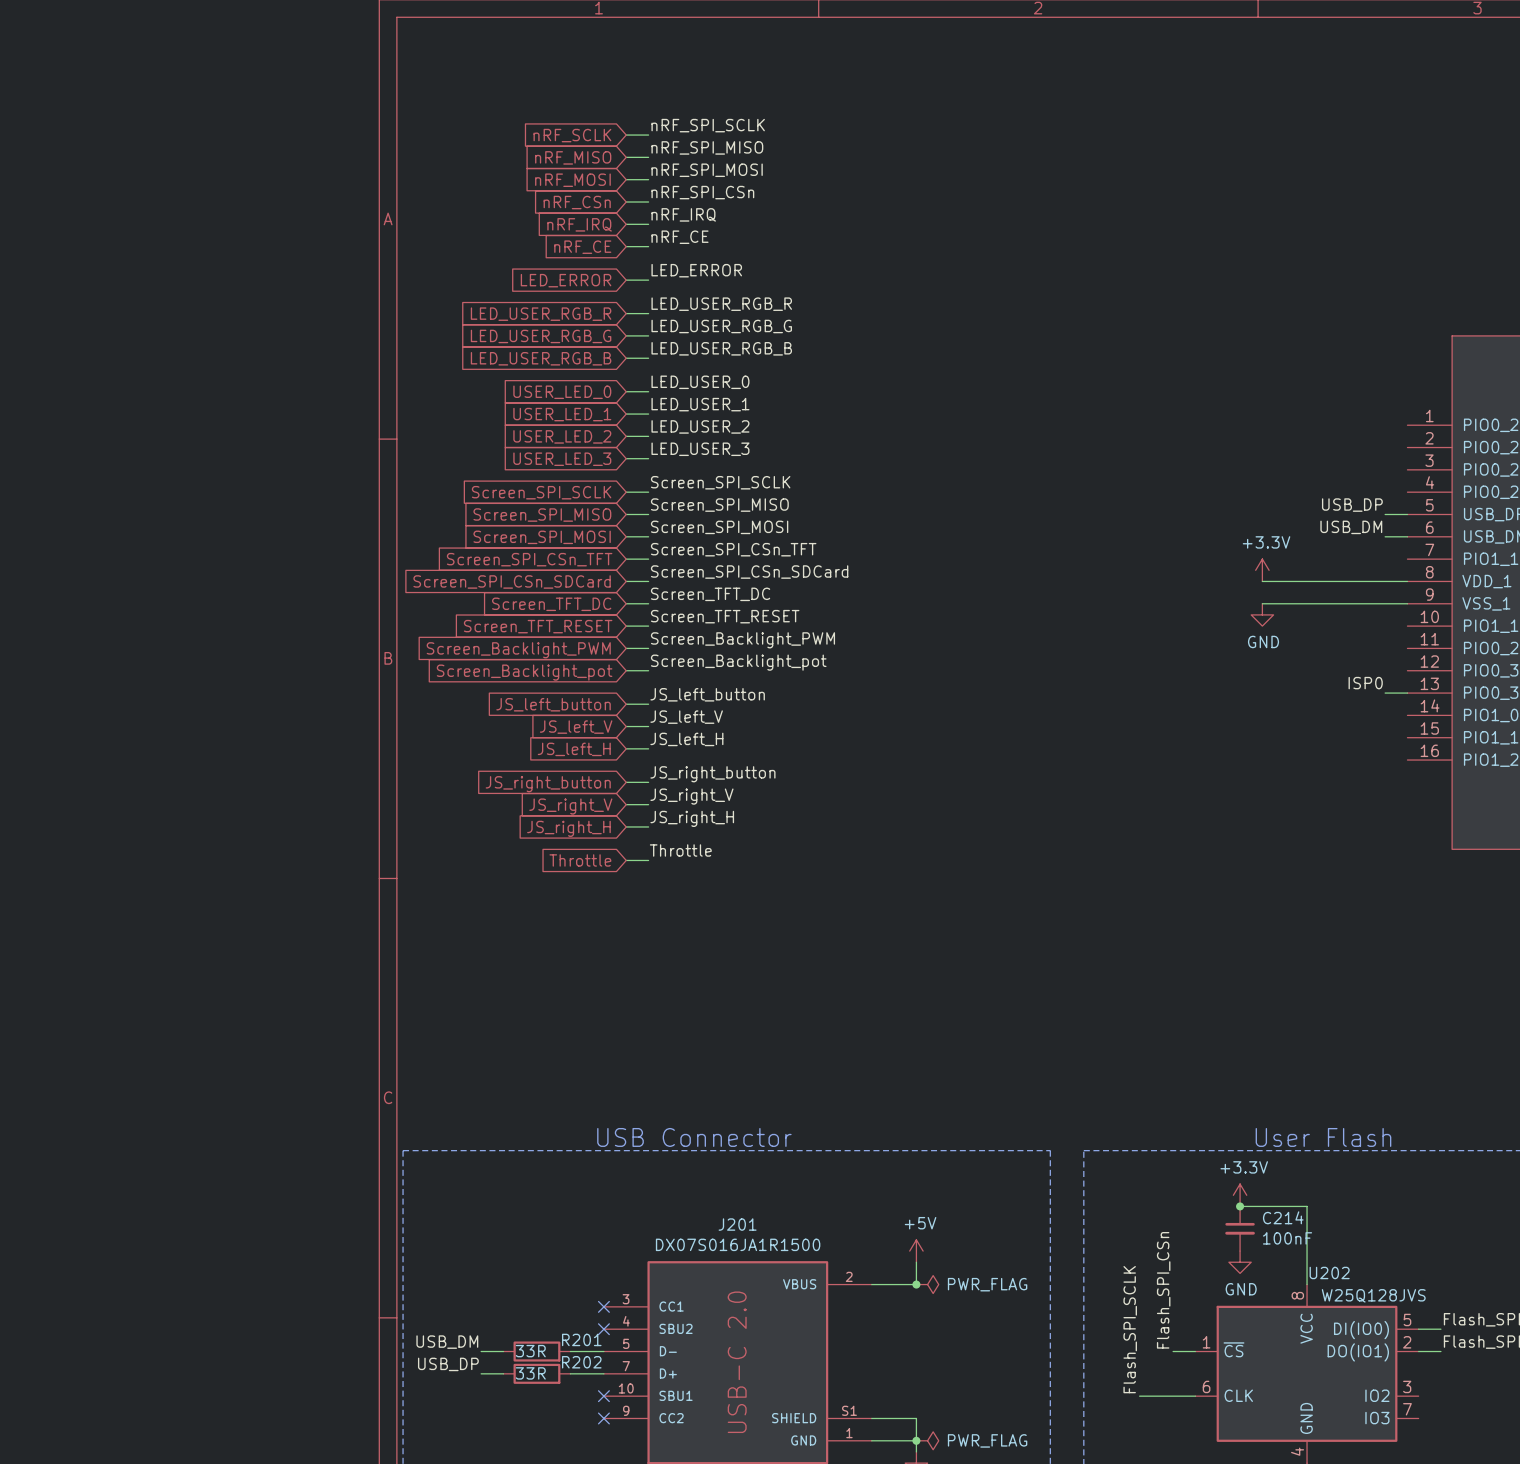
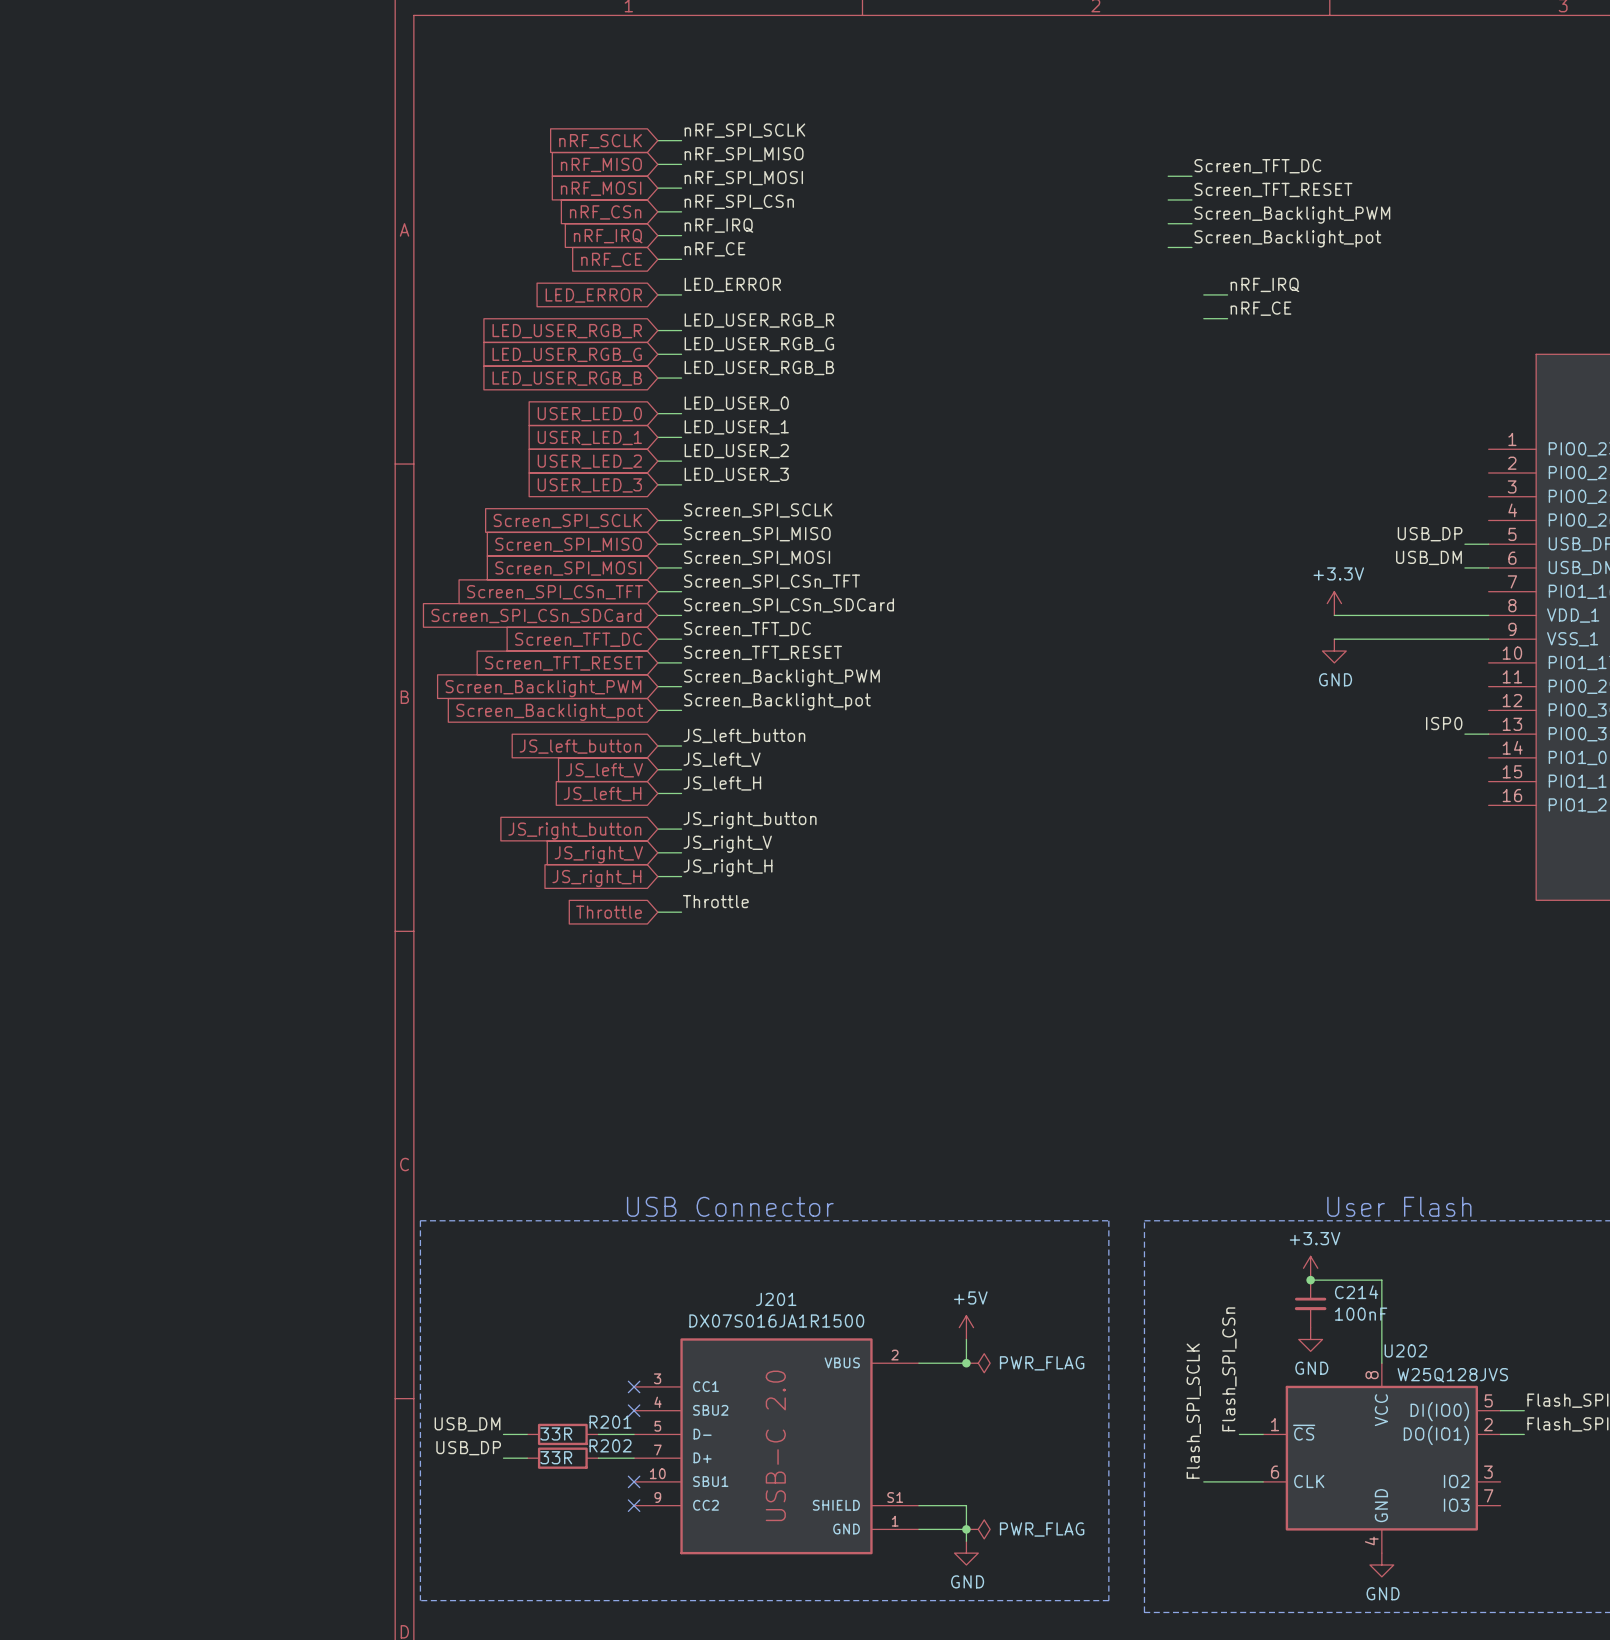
label: none -> Screen_TFT_DC (1257, 166)
wire: none -> (1168, 176) (1191, 176)
label: none -> Screen_TFT_RESET (1273, 189)
wire: none -> (1168, 199) (1191, 199)
label: none -> Screen_Backlight_PWM (1292, 215)
wire: none -> (1168, 223) (1191, 223)
label: none -> Screen_Backlight_pot (1287, 238)
wire: none -> (1168, 247) (1191, 247)
label: none -> nRF_IRQ (1264, 284)
wire: none -> (1203, 294) (1227, 294)
label: none -> nRF_CE (1260, 308)
wire: none -> (1203, 318) (1227, 318)

